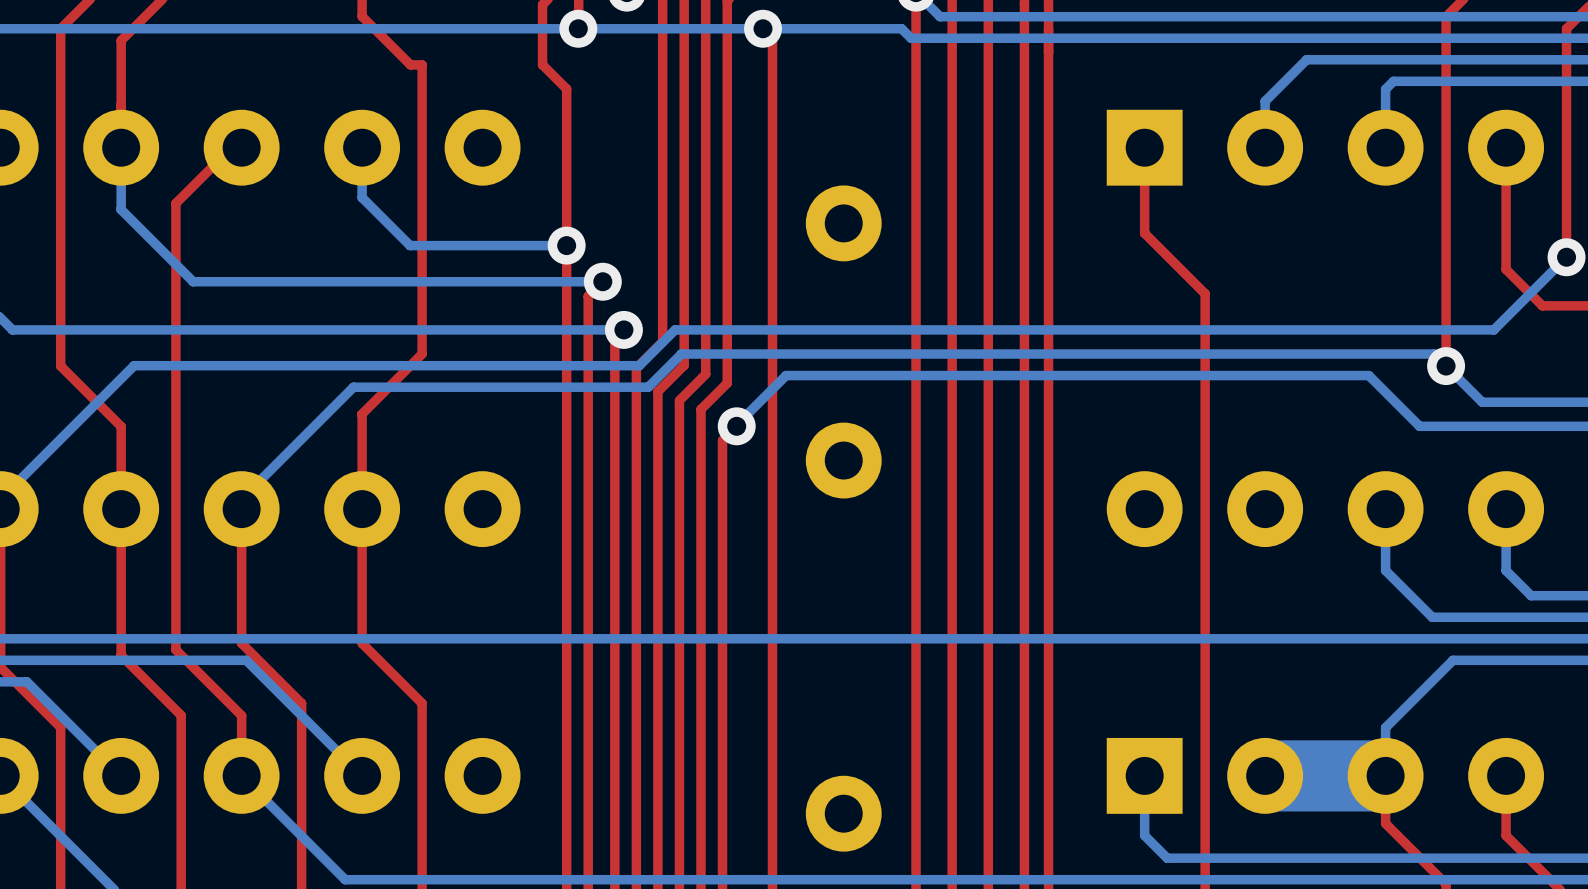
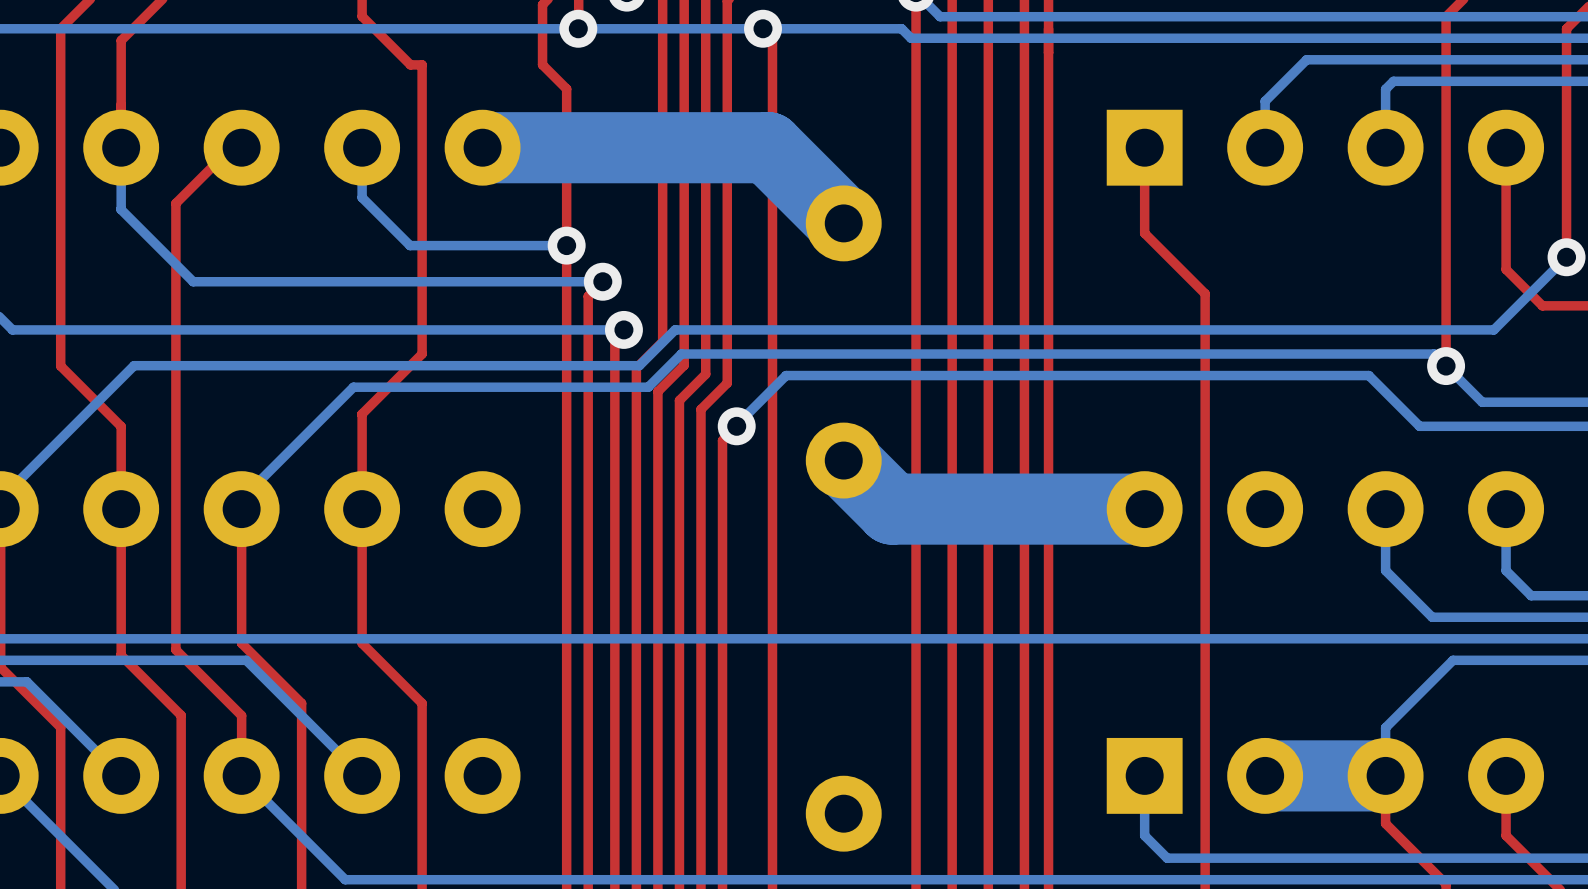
bottom track: none -> (482, 147) (768, 147) (843, 223)
bottom track: none -> (843, 460) (892, 509) (1144, 509)

